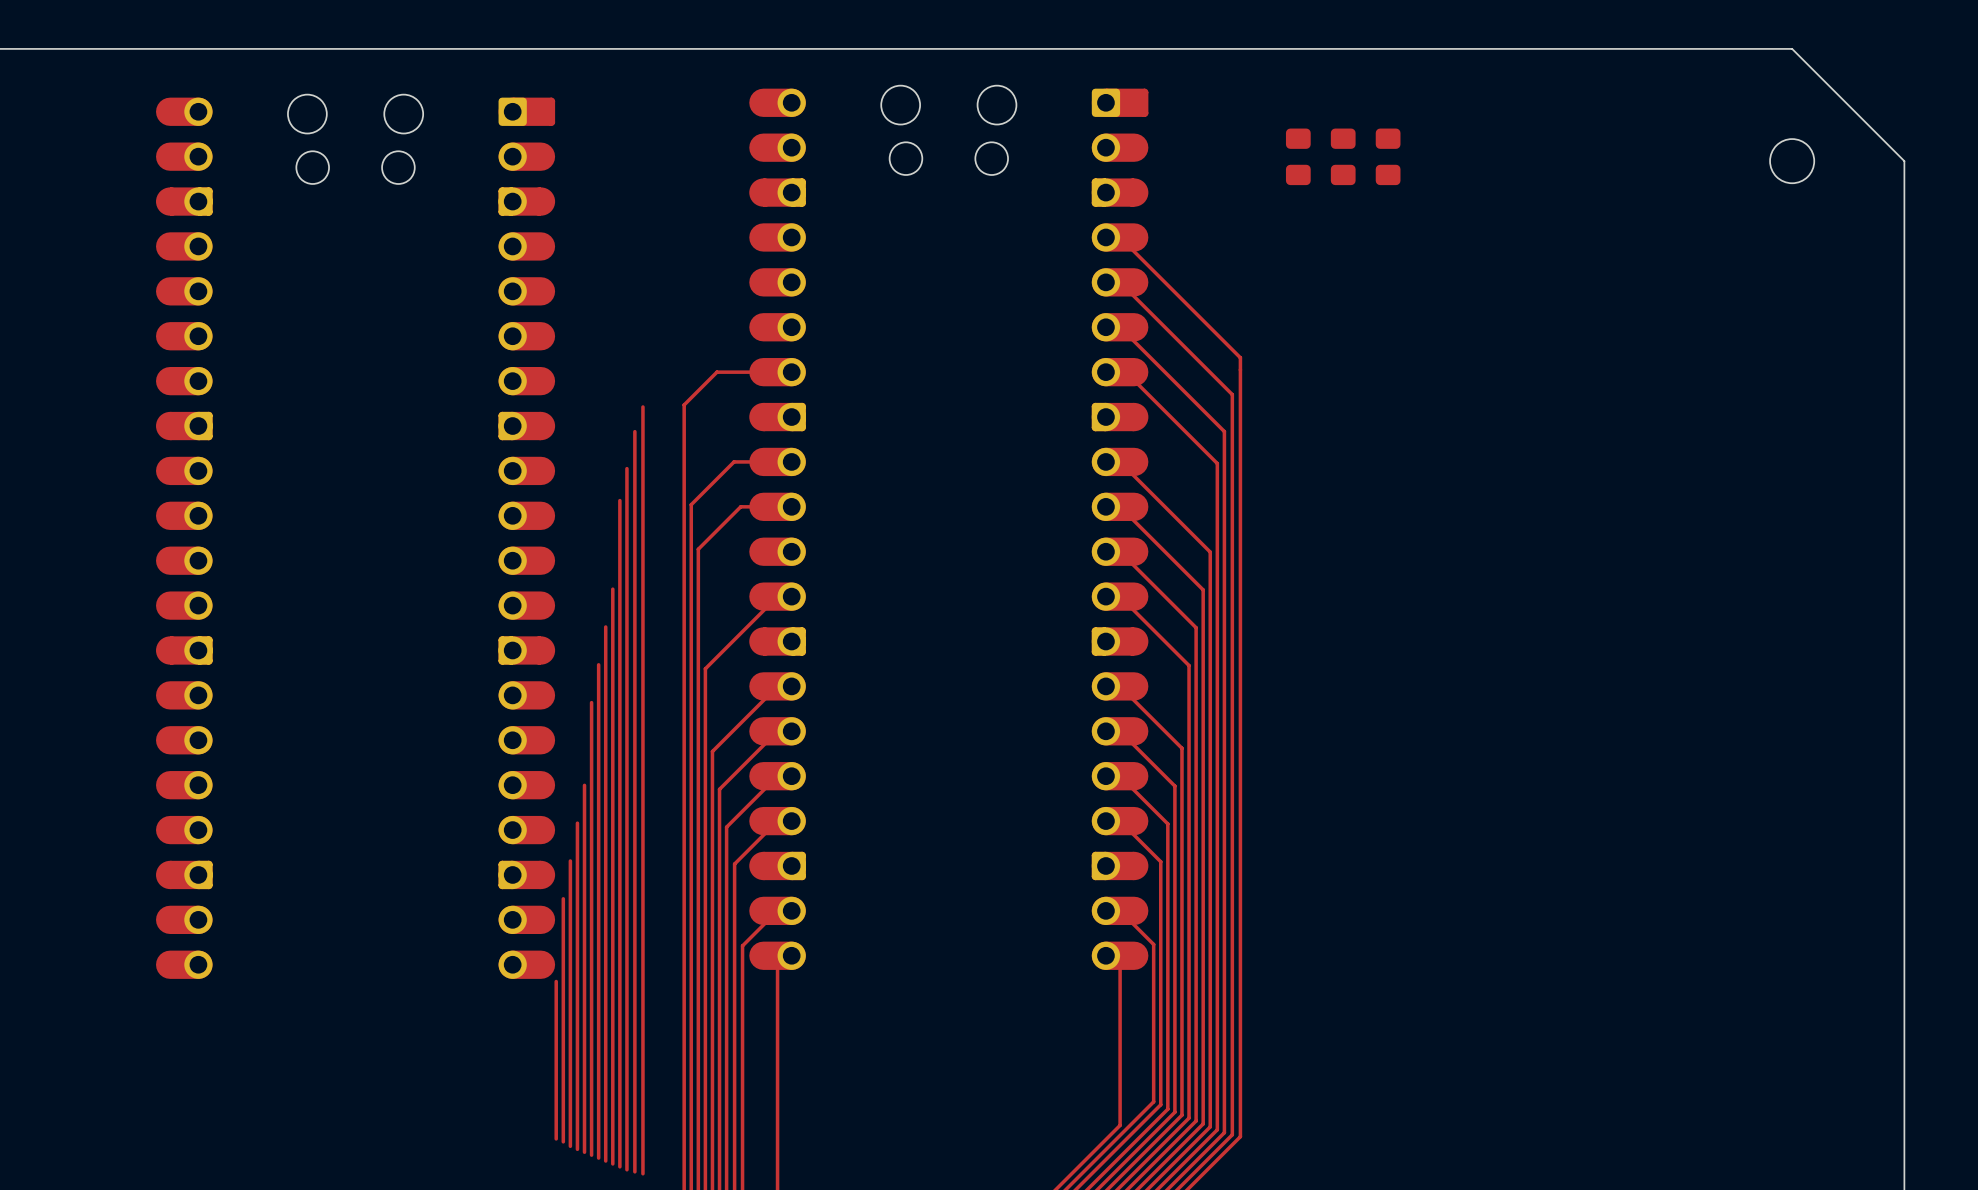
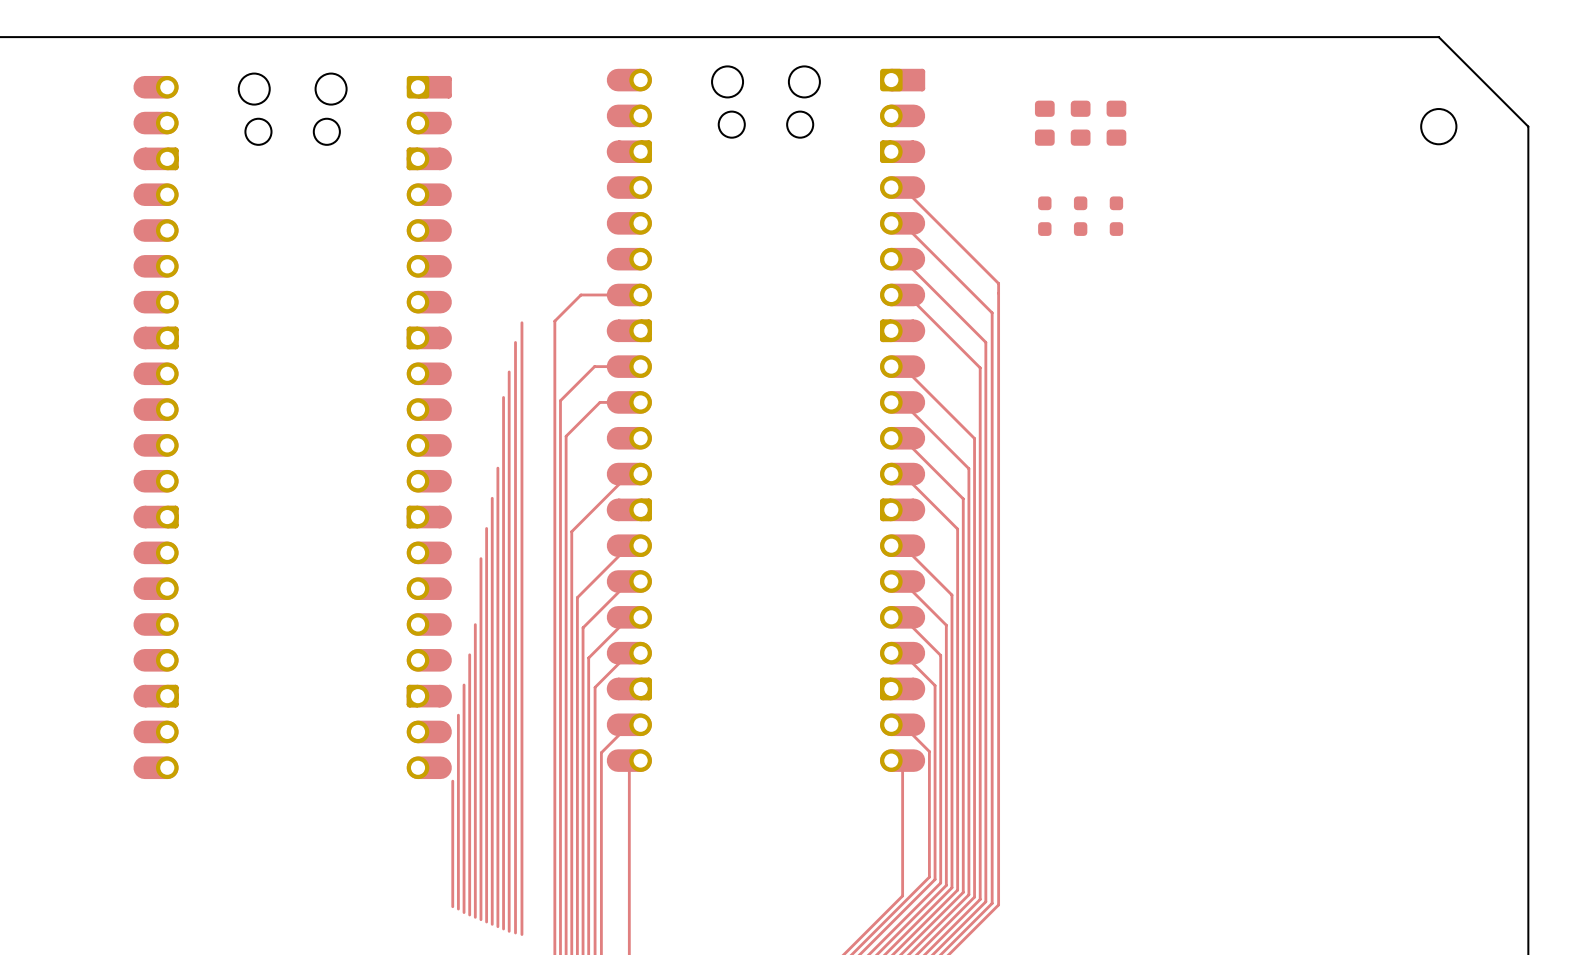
part: none -> (1044, 216)
part: none -> (1080, 216)
part: none -> (1116, 216)

